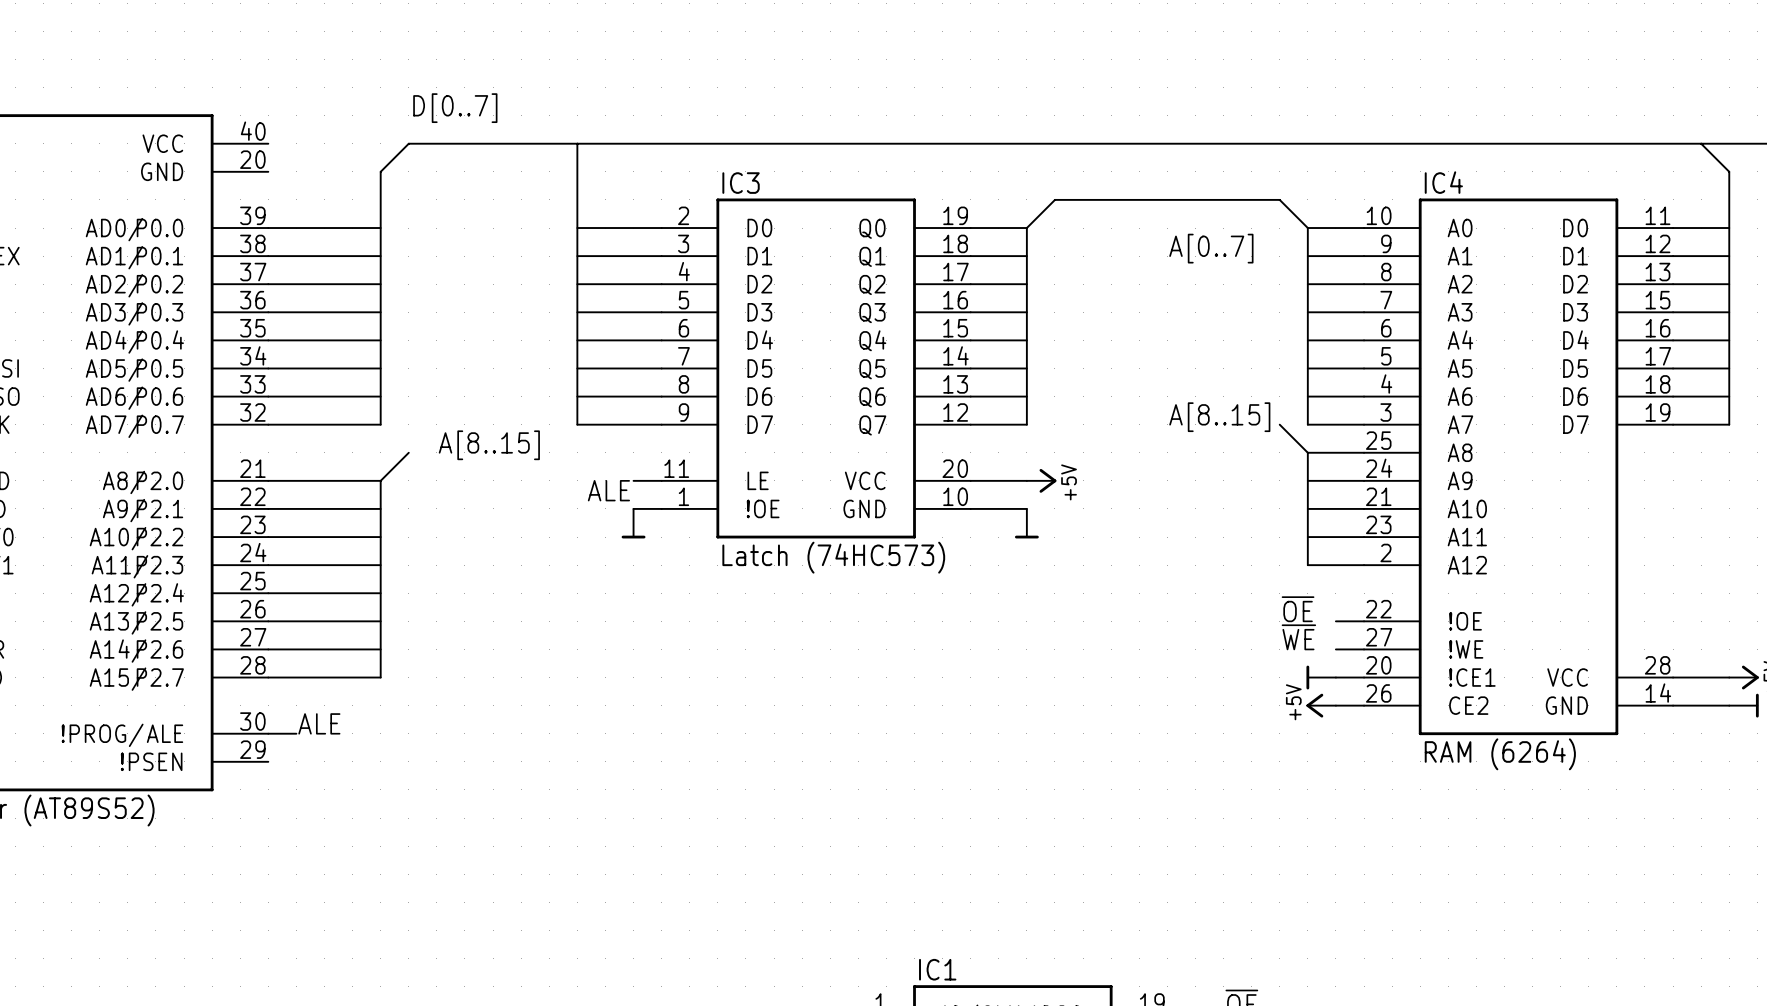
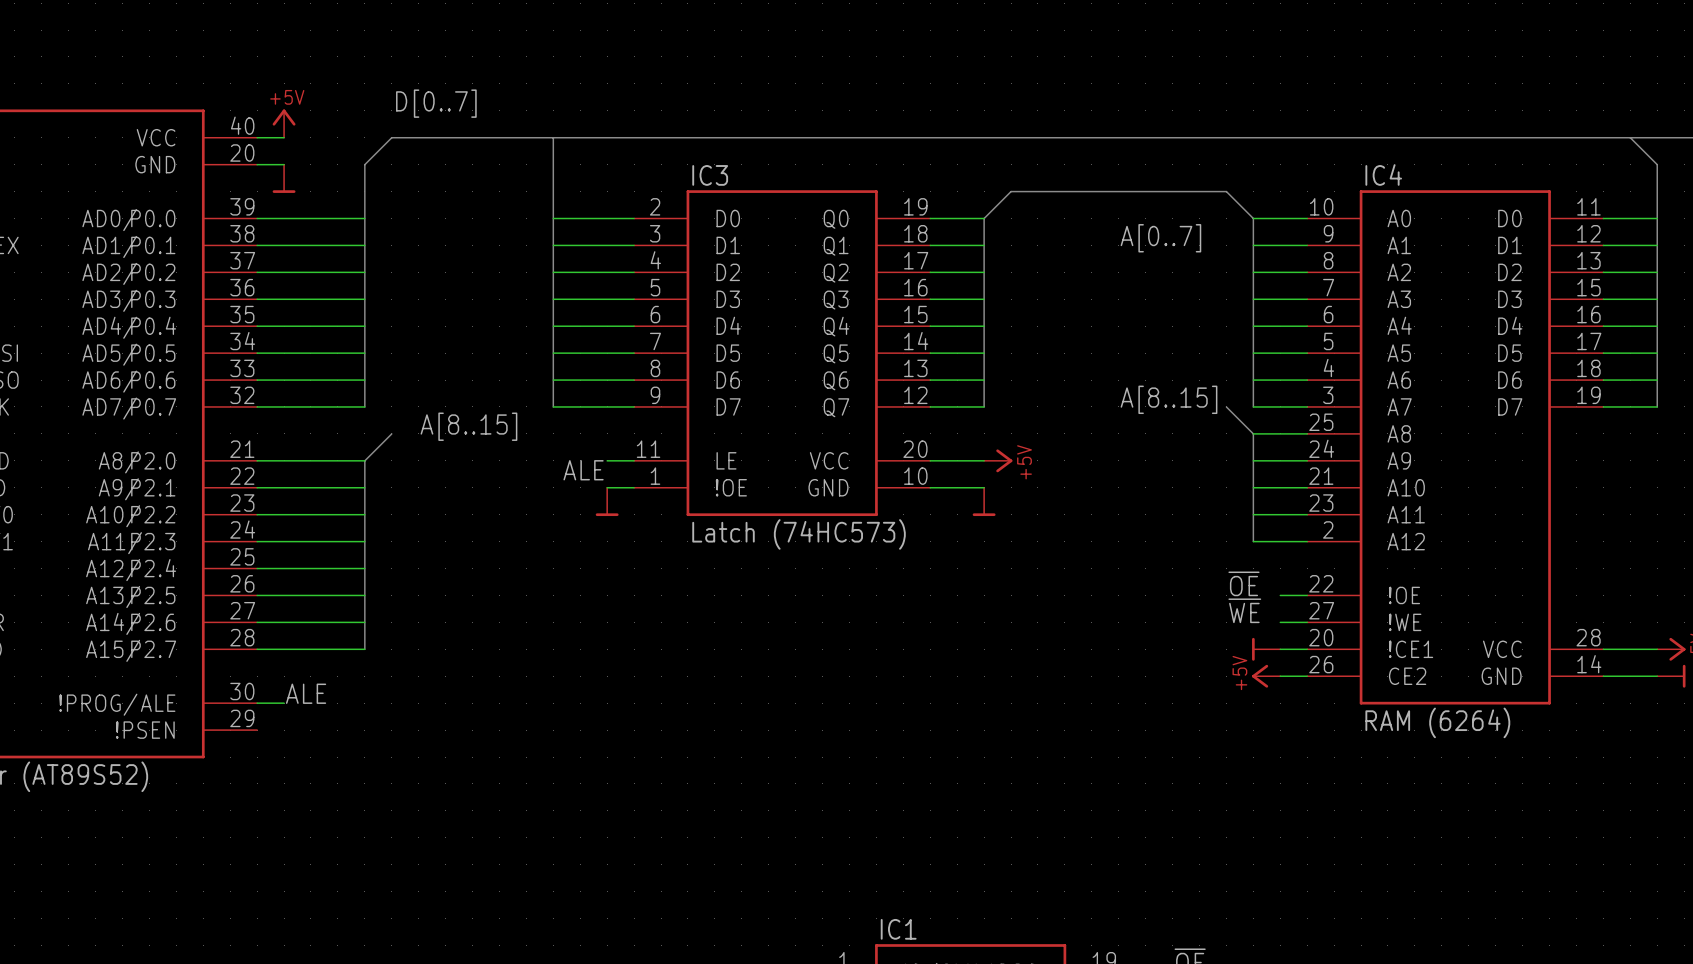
power symbol: none -> (284, 123)
wire: none -> (257, 137) (284, 137)
wire: none -> (257, 164) (284, 164)
power symbol: none -> (284, 178)

